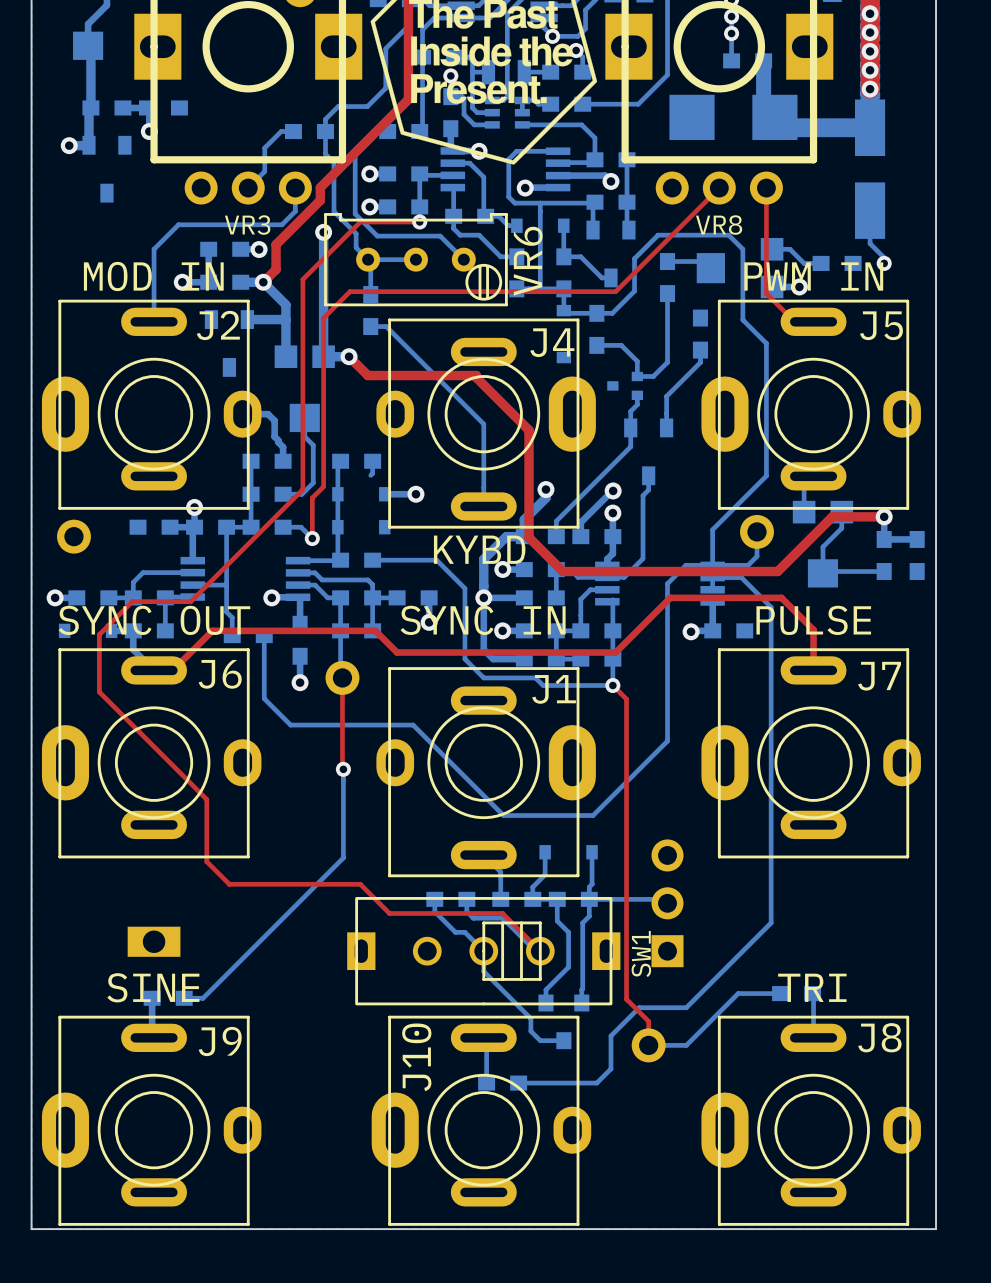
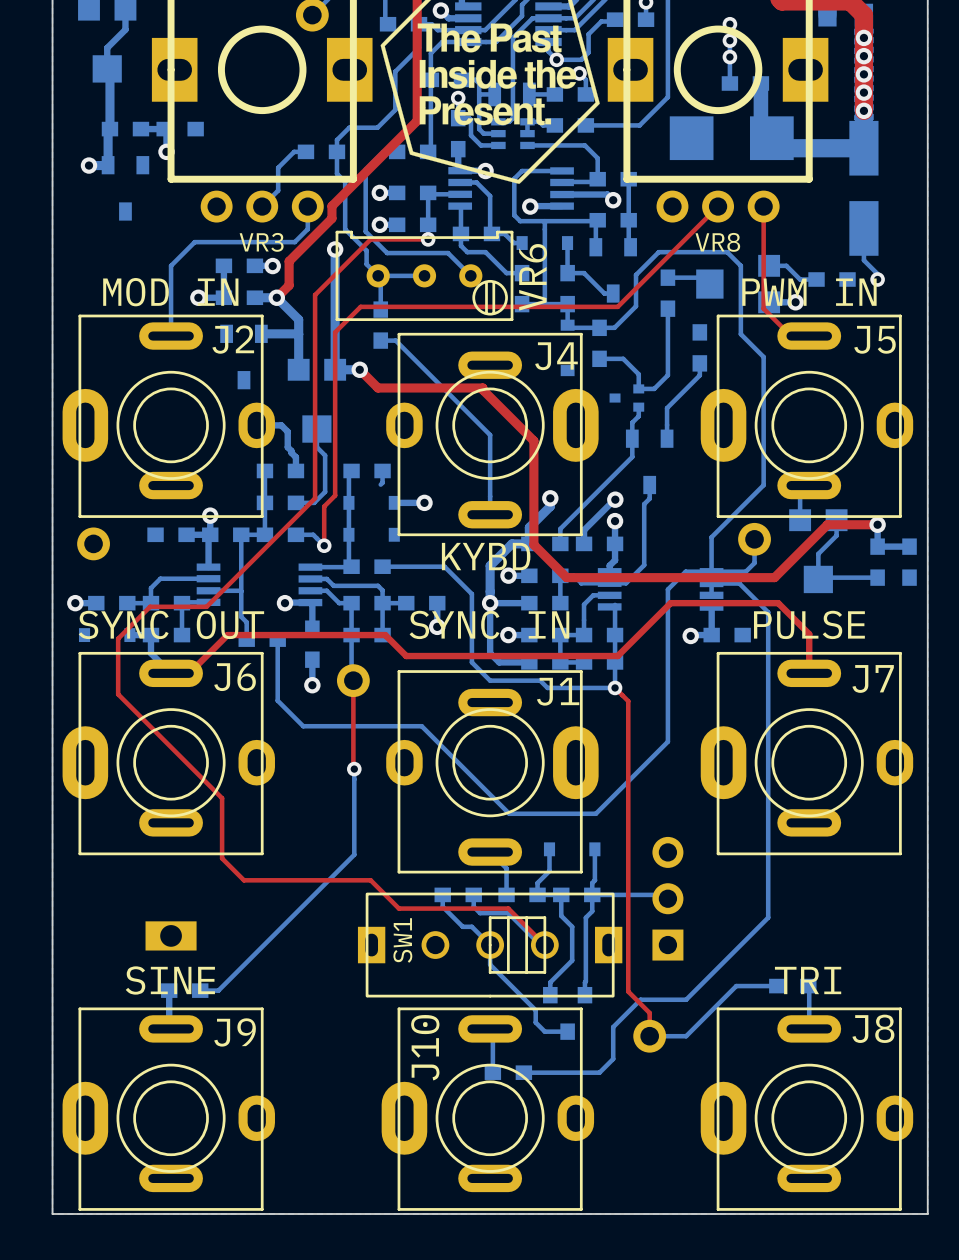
SW1 name position: SW1 (641, 954) -> SW1 (402, 940)

